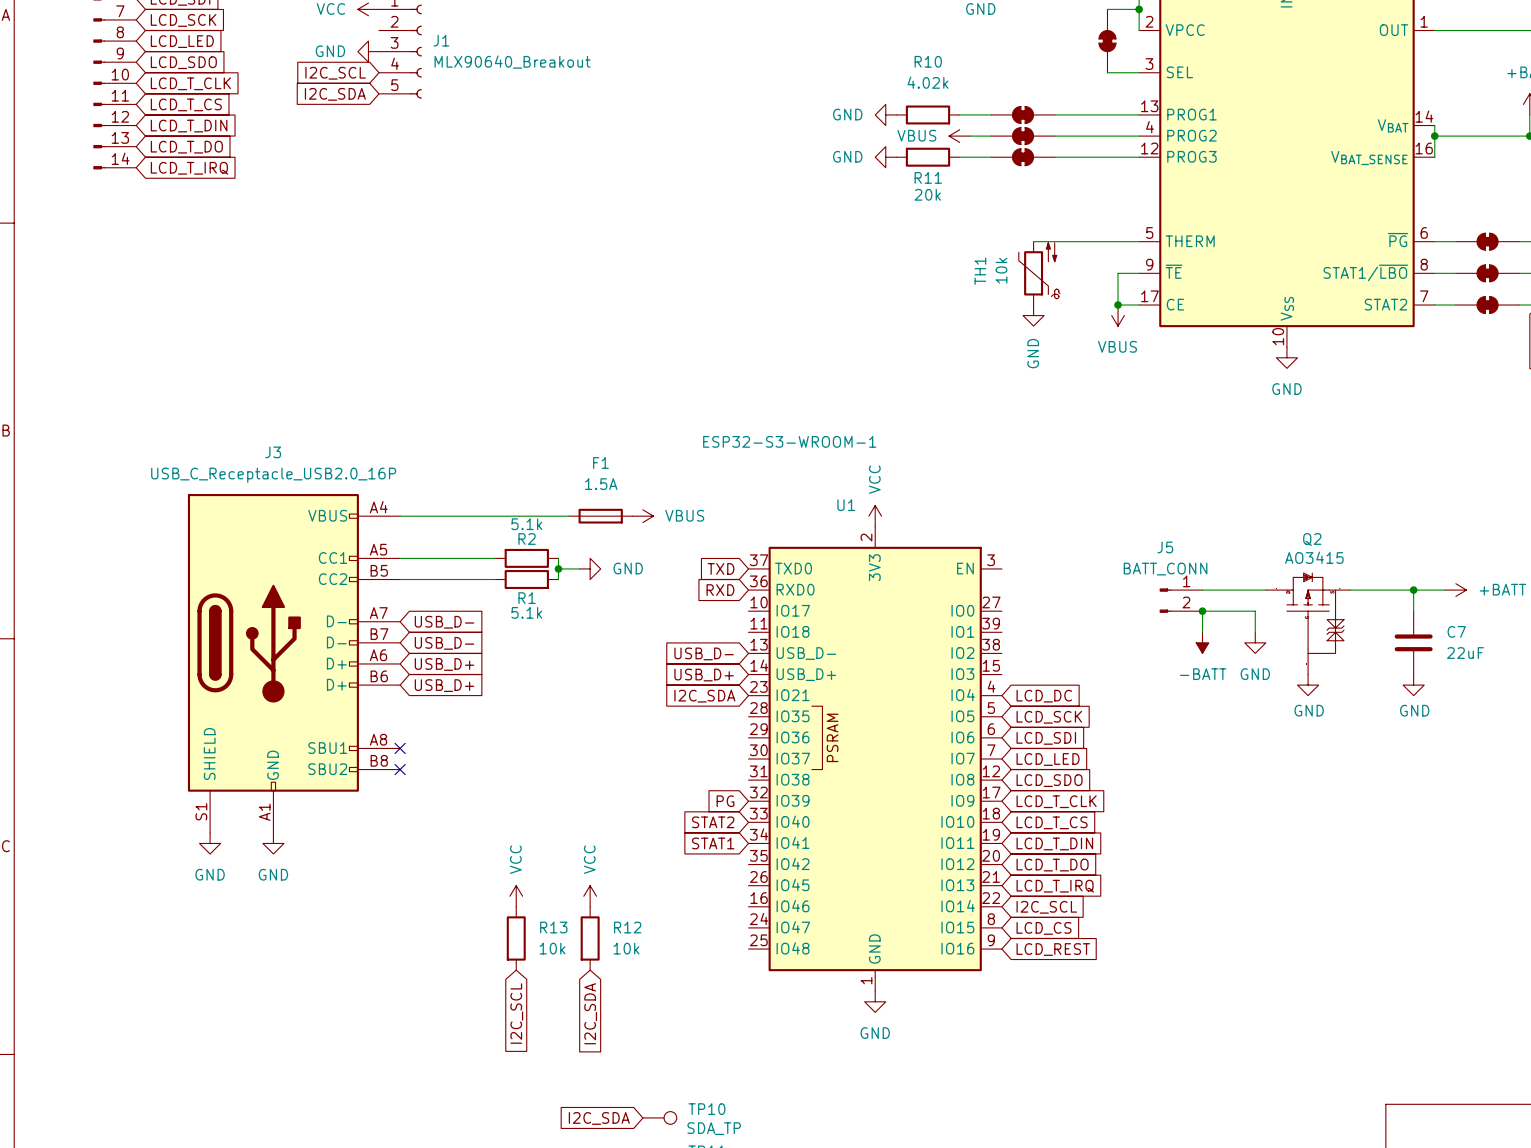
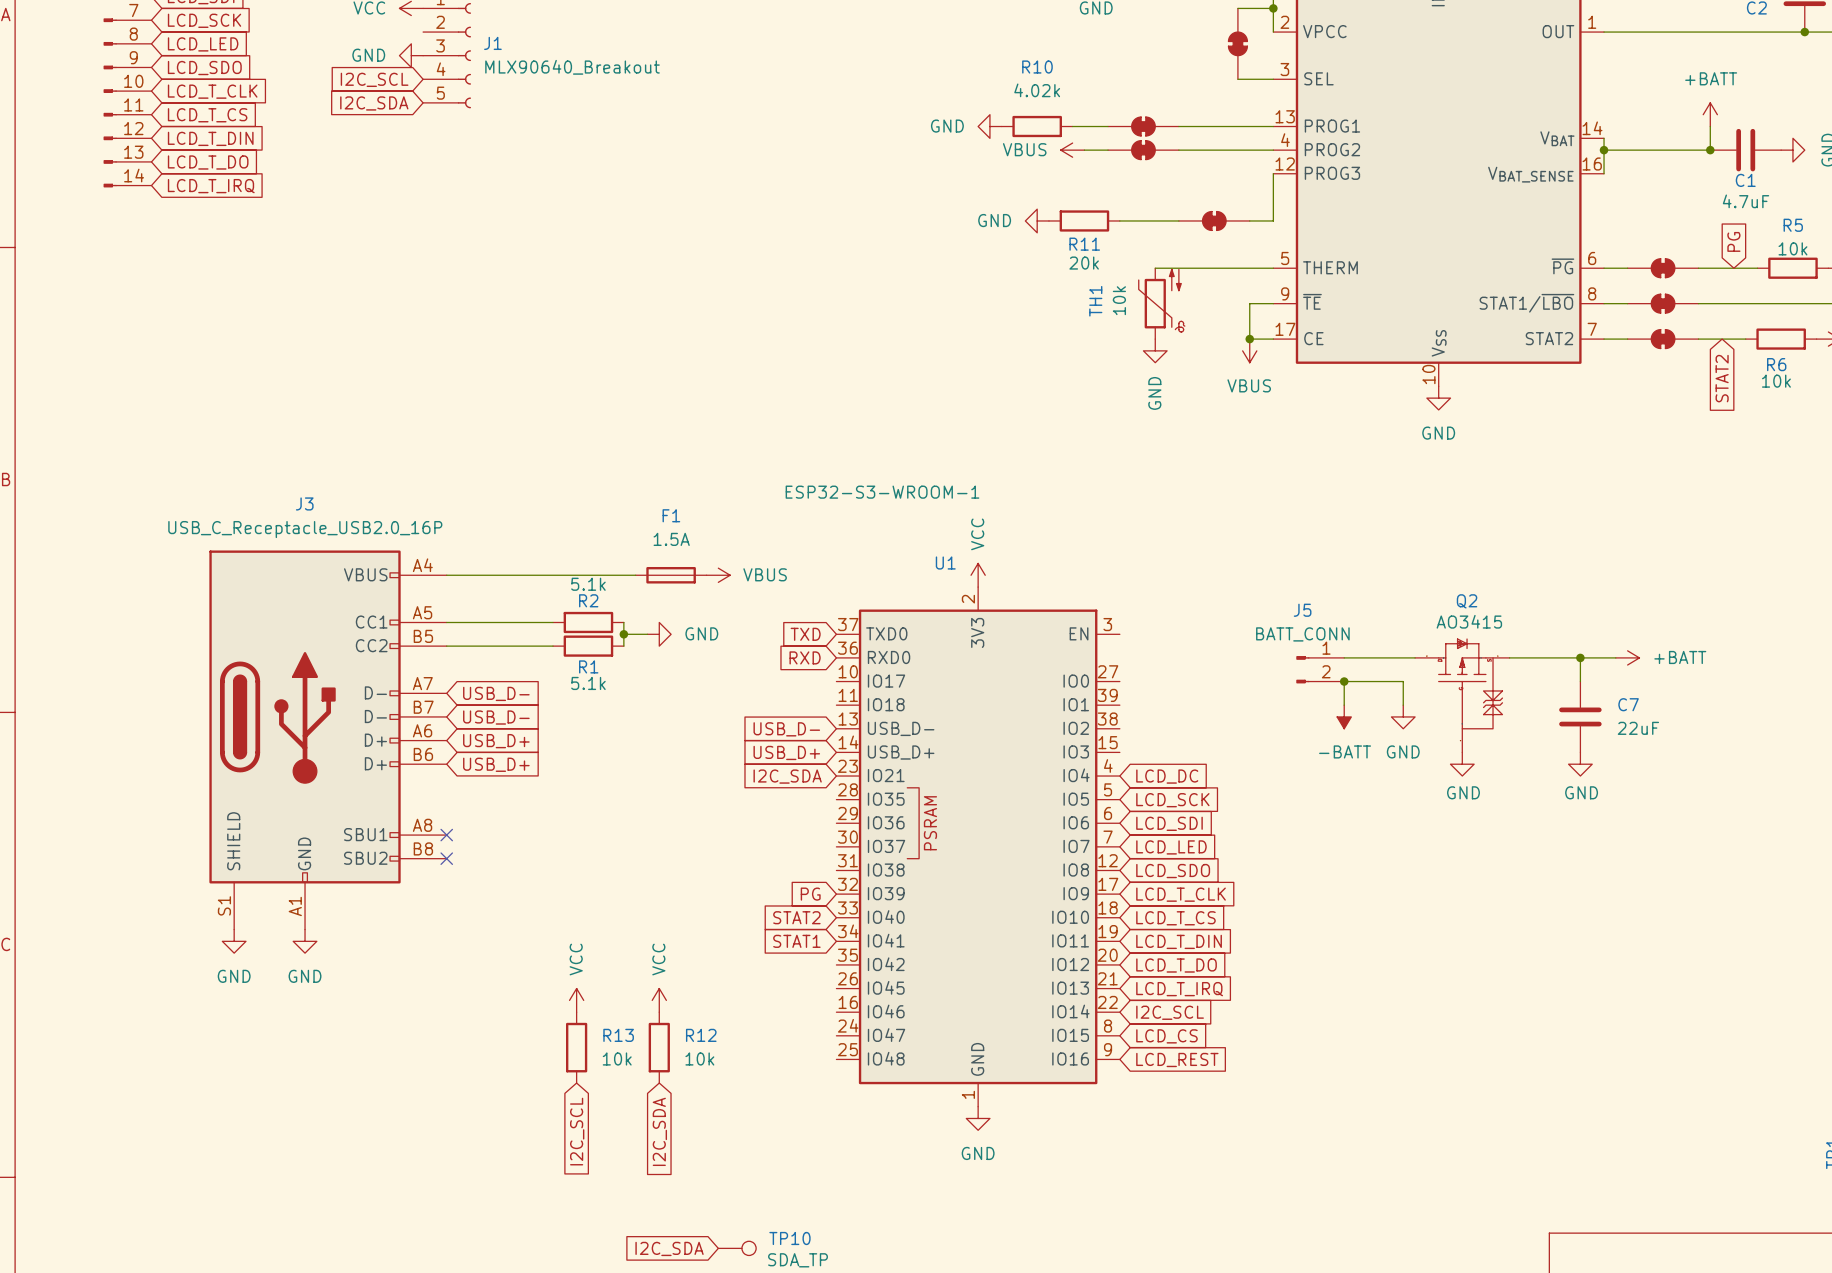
power symbol position: GND (885, 157) -> GND (1037, 220)
R11 position: (928, 157) -> (1084, 220)
wire: (959, 157) (991, 157) -> none
part position: (1023, 157) -> (1214, 220)
wire: (1054, 157) (1139, 157) -> (1249, 220) (1273, 220) (1273, 173)
wire: none -> (1119, 220) (1178, 220)

